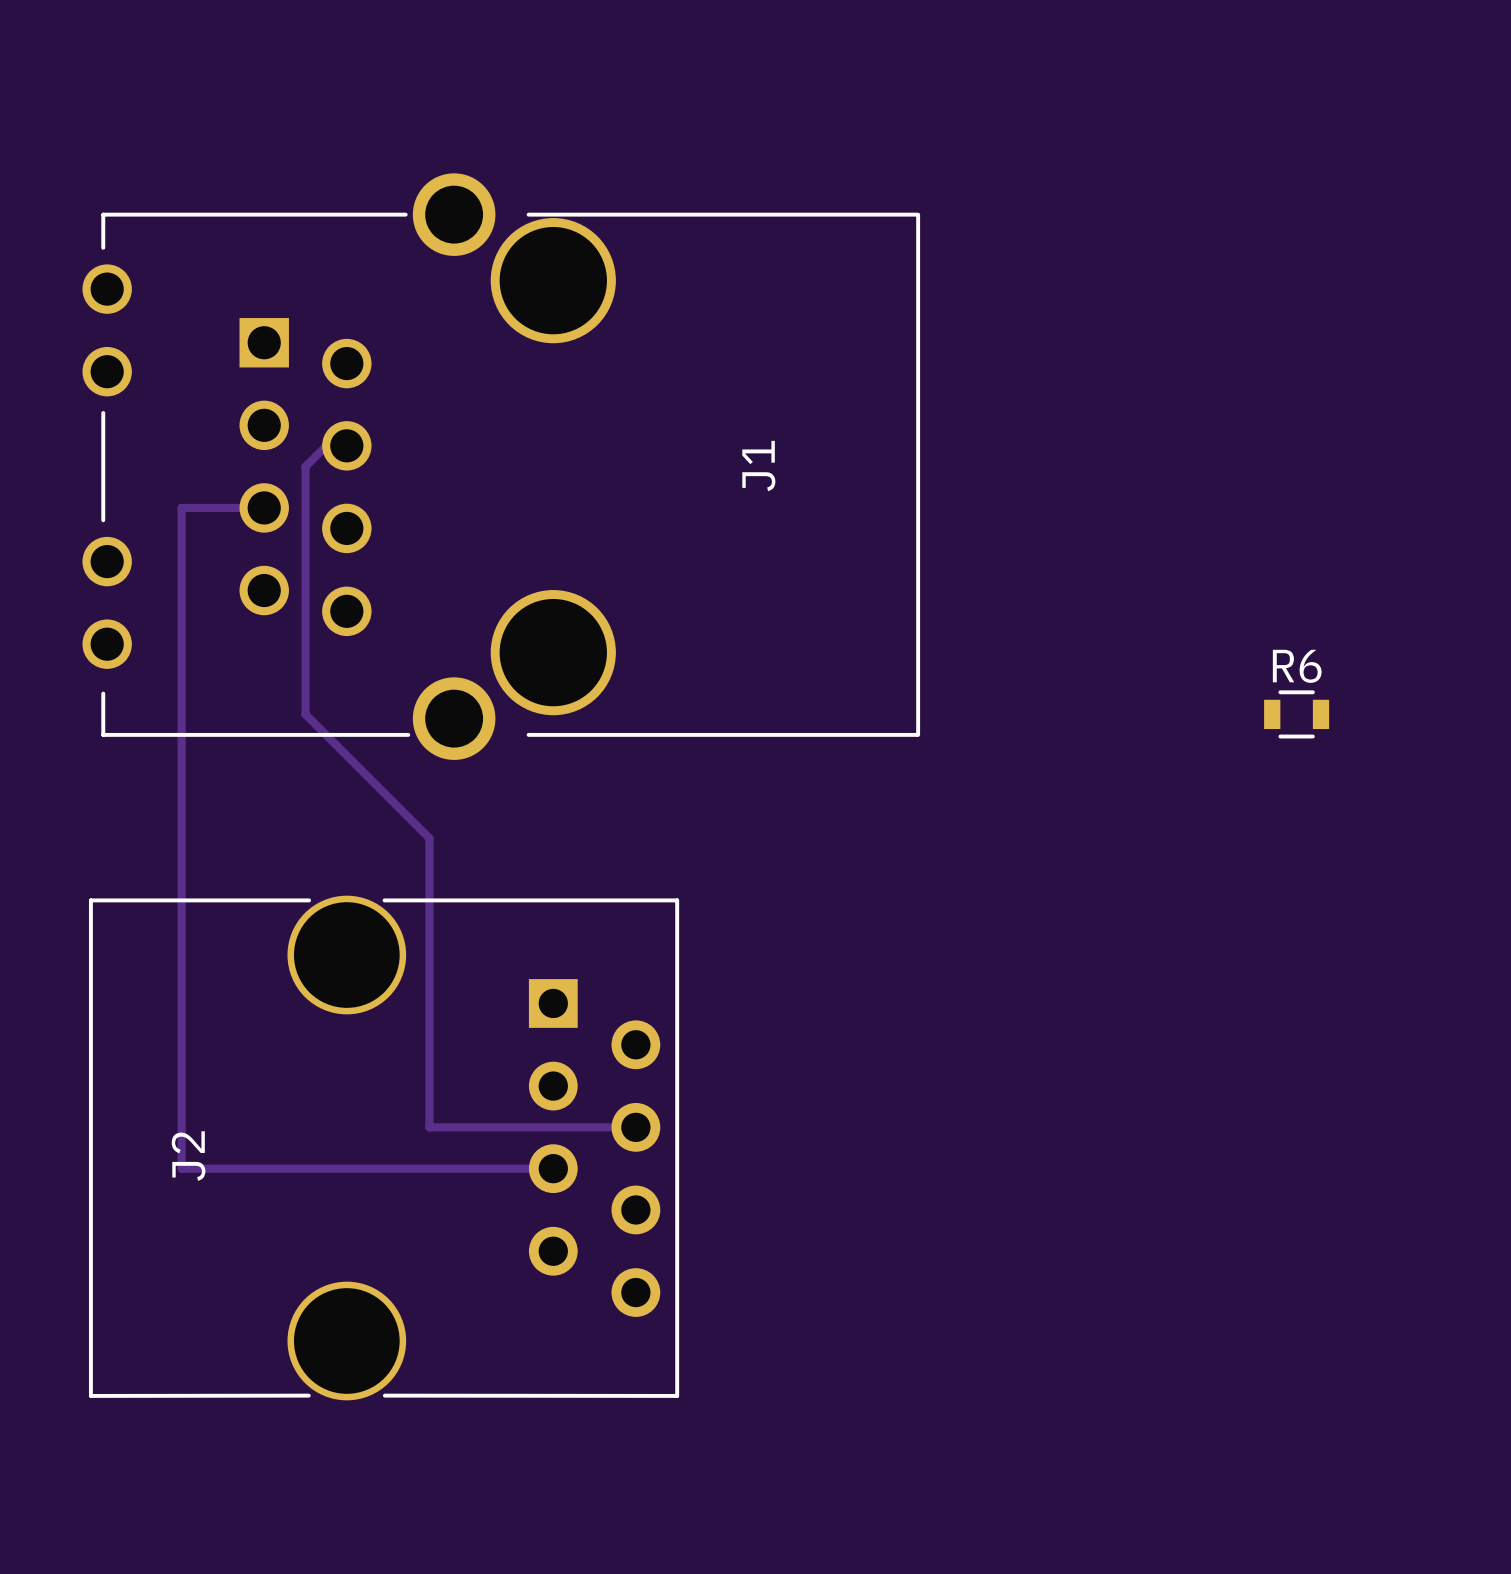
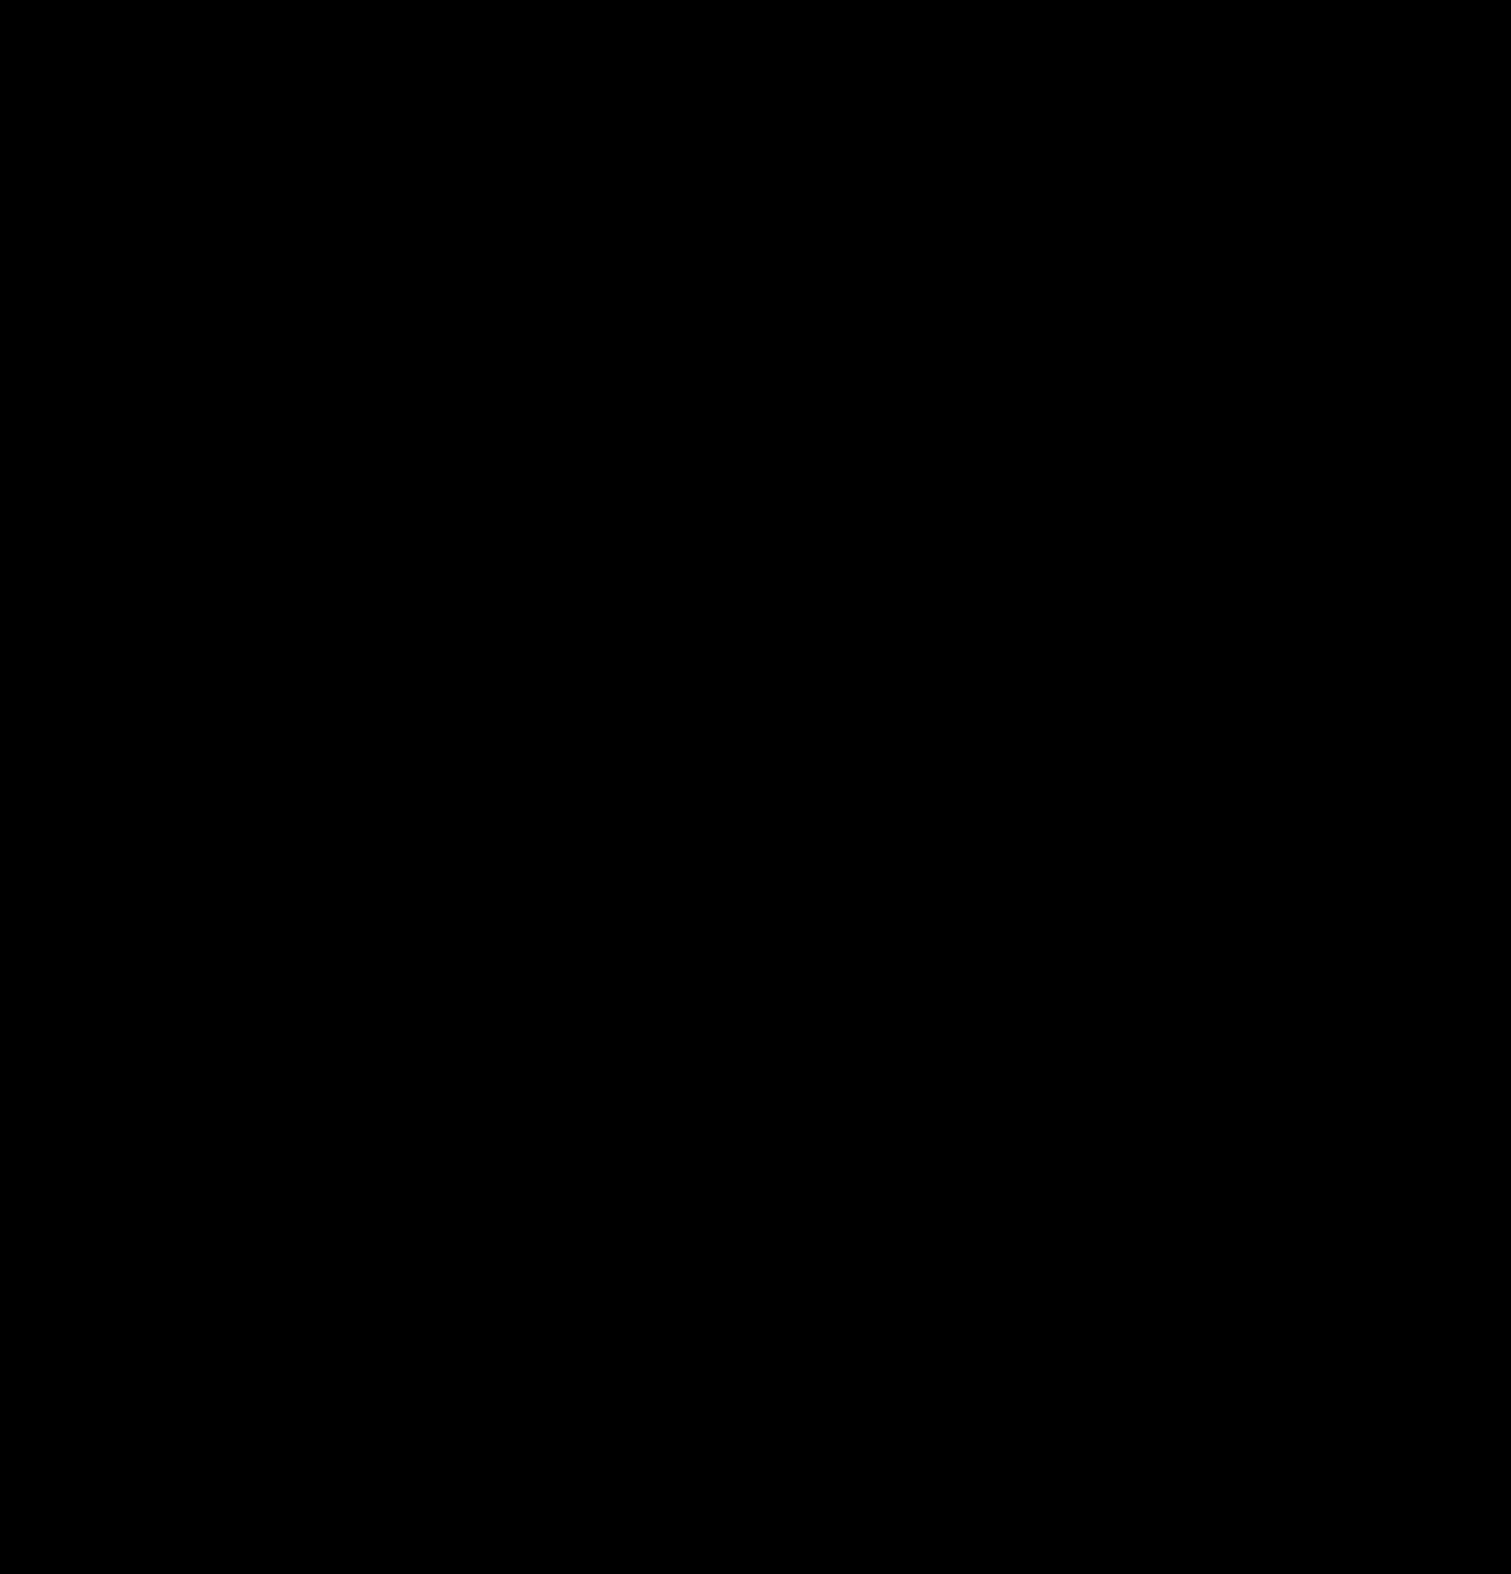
track: (346, 445) (326, 445) (305, 466) (305, 714) (429, 838) (429, 1127) (635, 1127) -> none
J1: (501, 466) -> none
track: (264, 507) (181, 507) (181, 1168) (553, 1168) -> none
R6: (1296, 714) -> none
J2: (384, 1148) -> none

